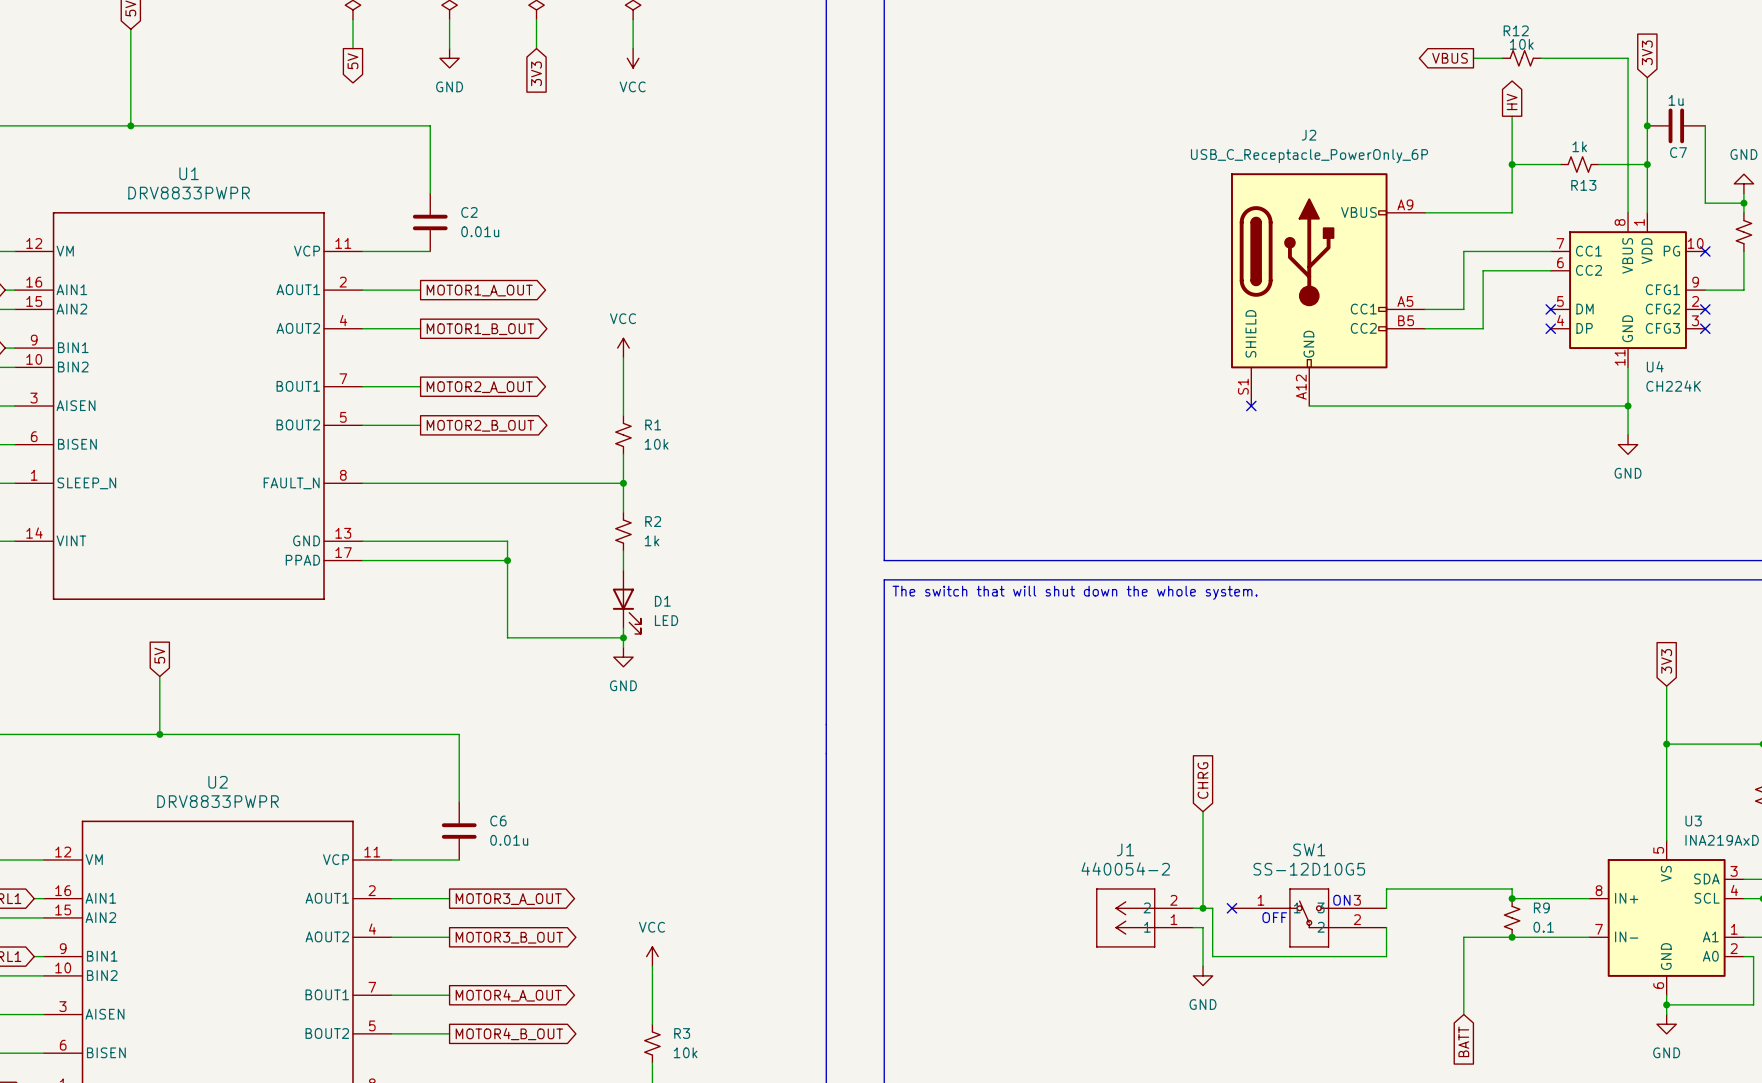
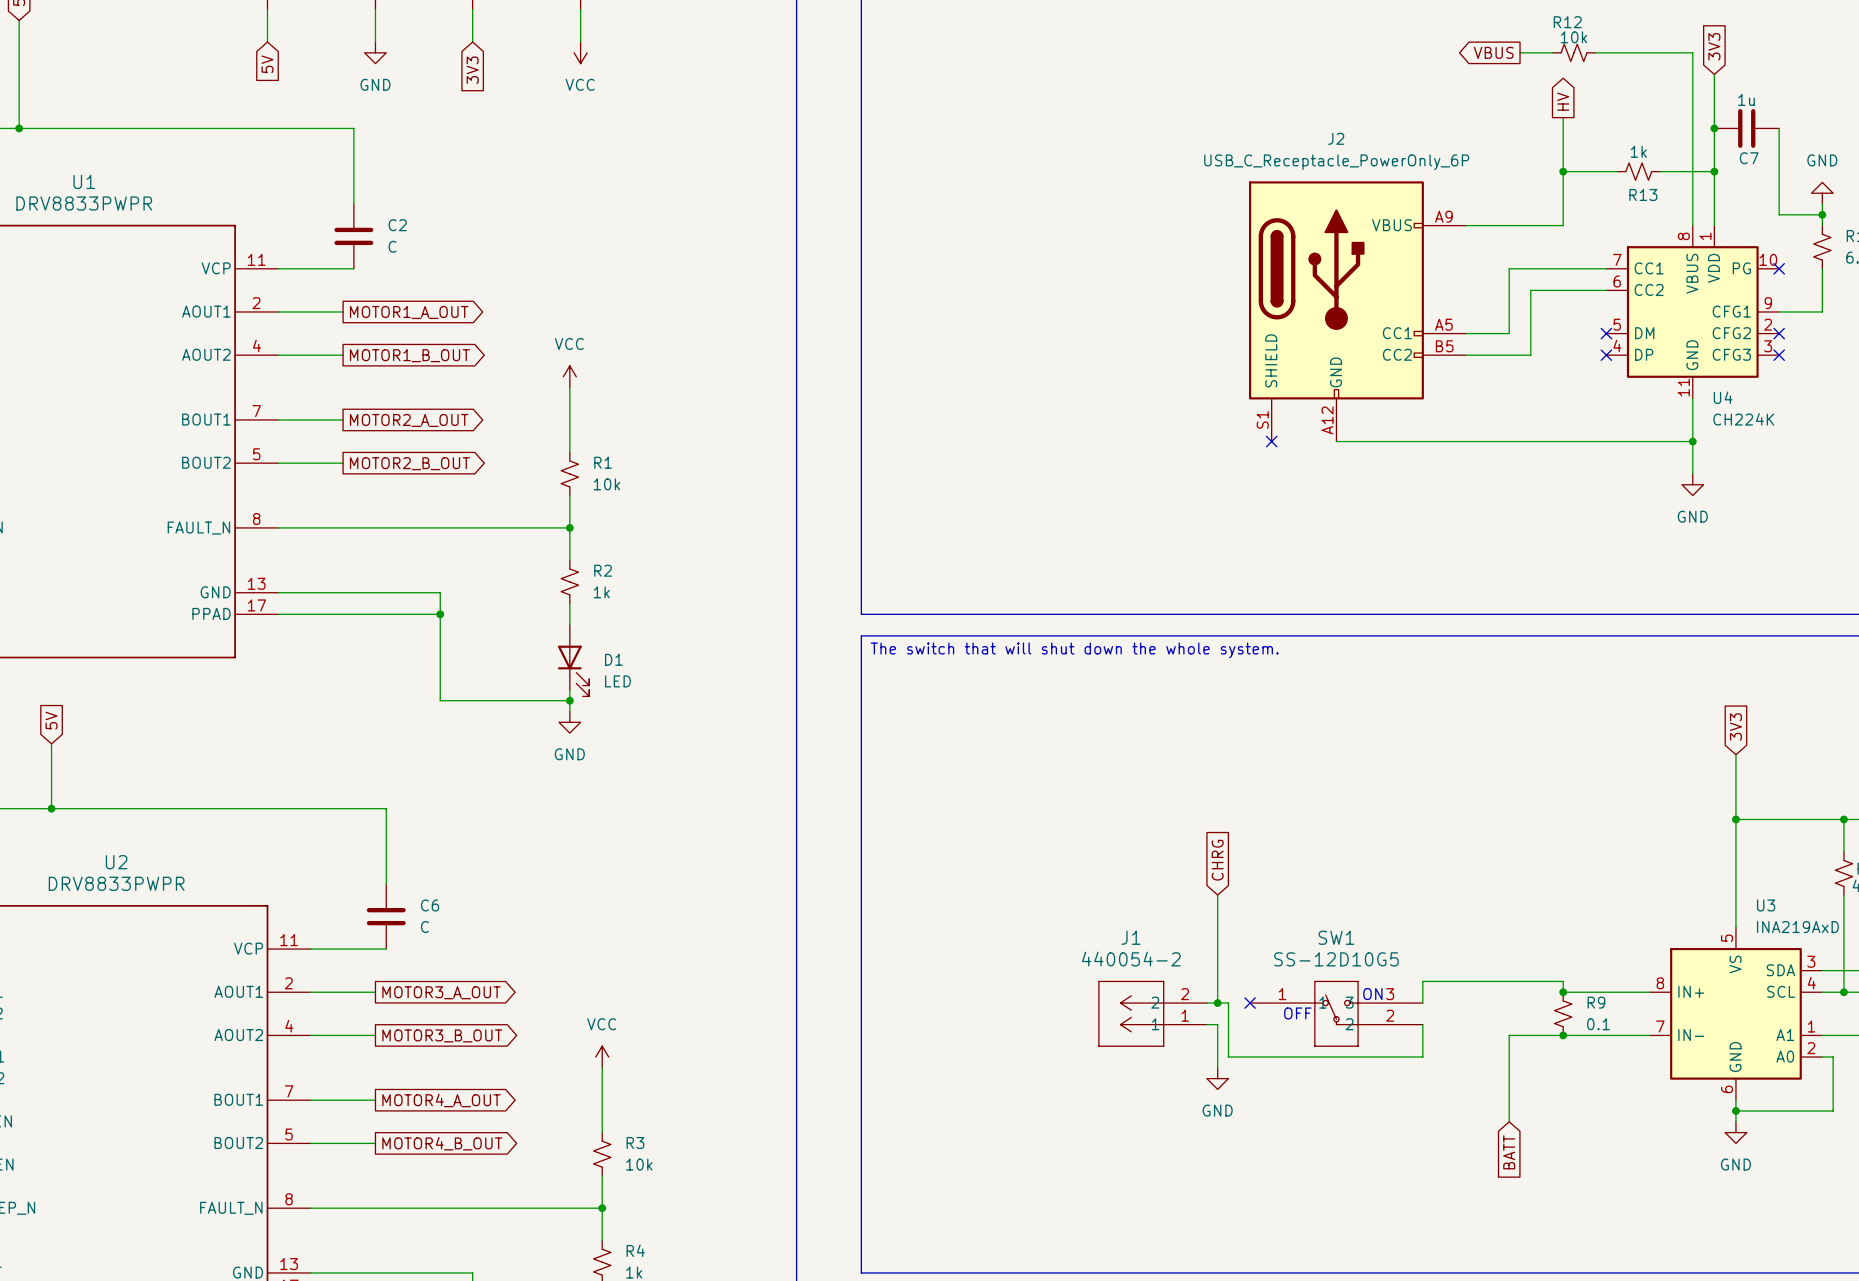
global label shape: output (352, 61) -> input (267, 64)
C2 value: 0.01u (480, 231) -> C (392, 246)
C6 value: 0.01u (509, 840) -> C (424, 927)

